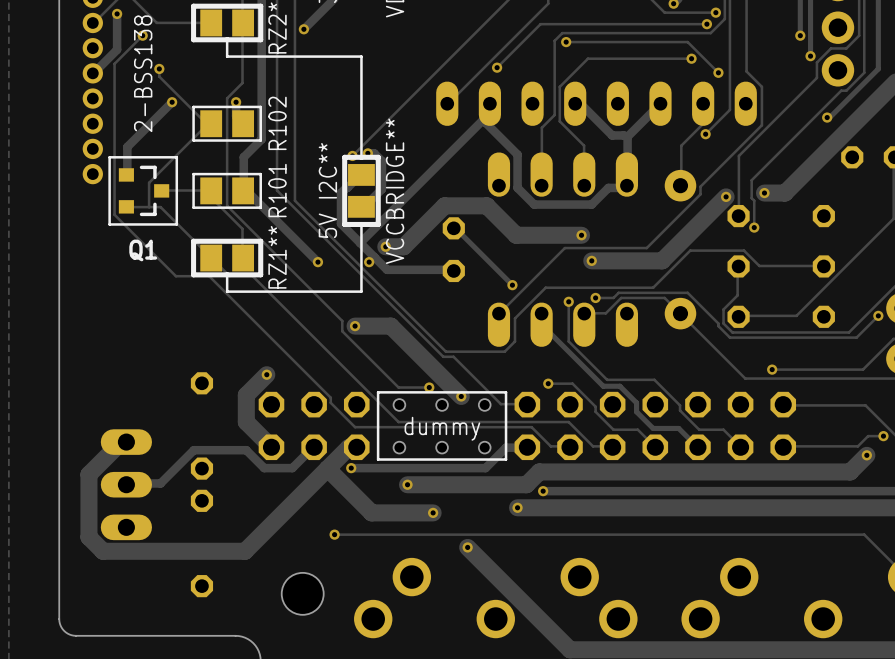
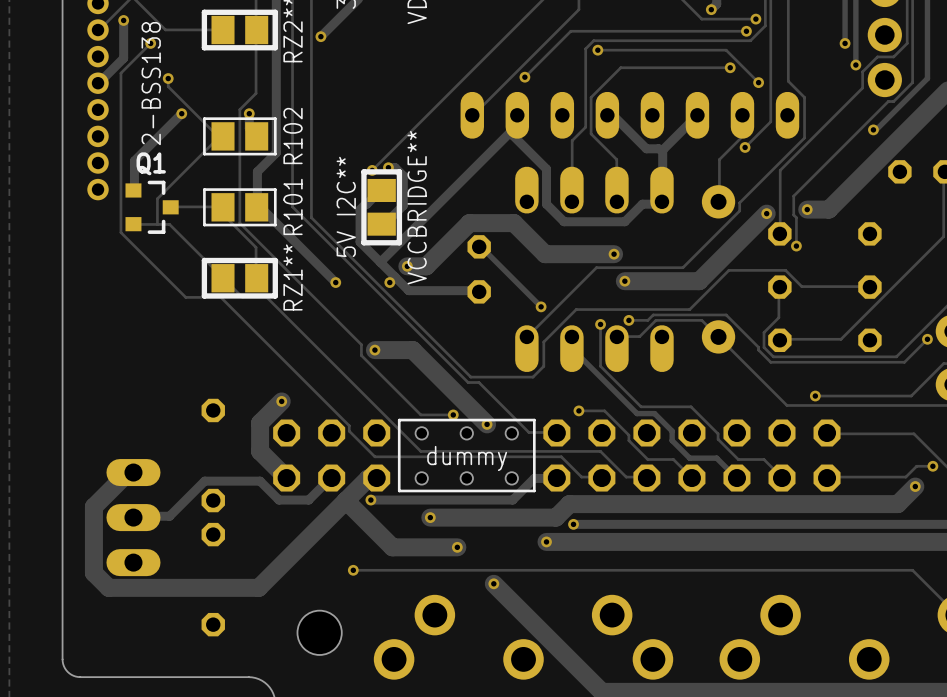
line: (227, 39) (227, 56) (361, 56) (361, 157) -> none
line: (176, 157) (109, 157) (109, 224) (176, 224) (176, 157) -> none
line: (361, 224) (361, 291) (227, 291) (227, 274) -> none
Q1 name position: Q1 (143, 250) -> Q1 (151, 163)

